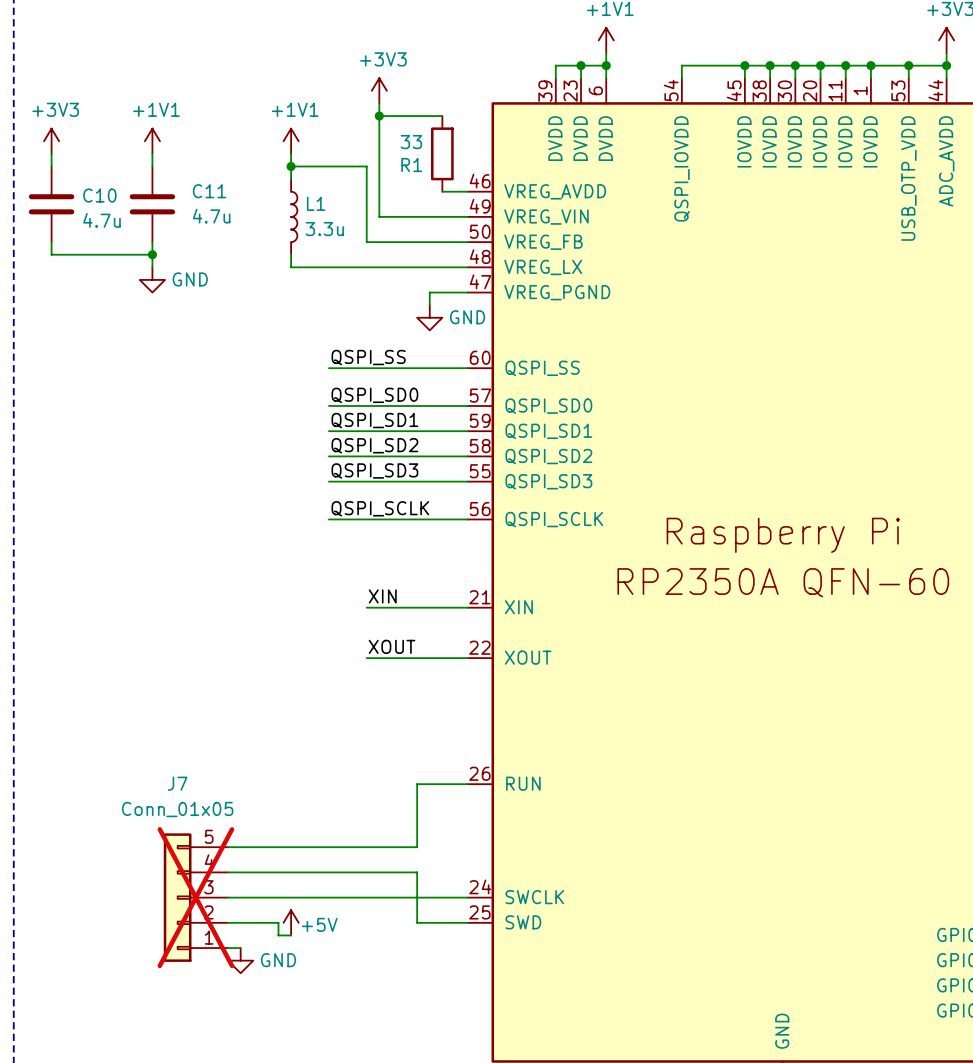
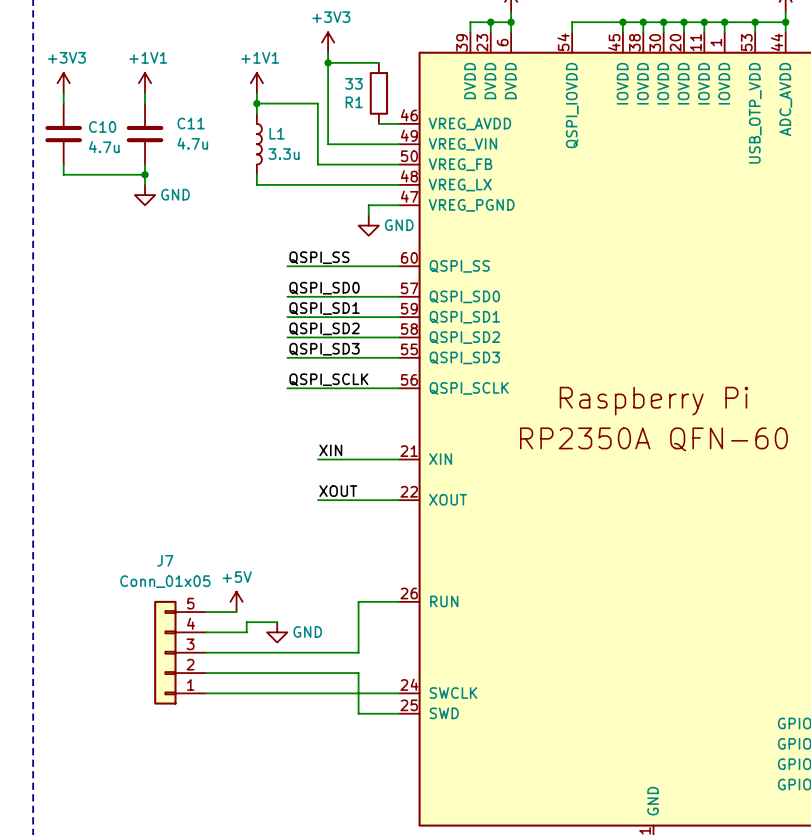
wire: none -> (206, 612) (236, 612)
wire: none -> (277, 622) (246, 622) (246, 632) (206, 632)
J7 position: (195, 897) -> (180, 652)
J7 do-not-place cross: (195, 897) -> none
wire: (228, 922) (278, 922) (278, 935) (291, 935) -> none
power symbol position: +5V (291, 922) -> +5V (236, 601)
power symbol text position: +5V (319, 924) -> +5V (237, 577)
wire: (228, 948) (240, 948) -> none
power symbol position: GND (240, 960) -> GND (277, 632)

